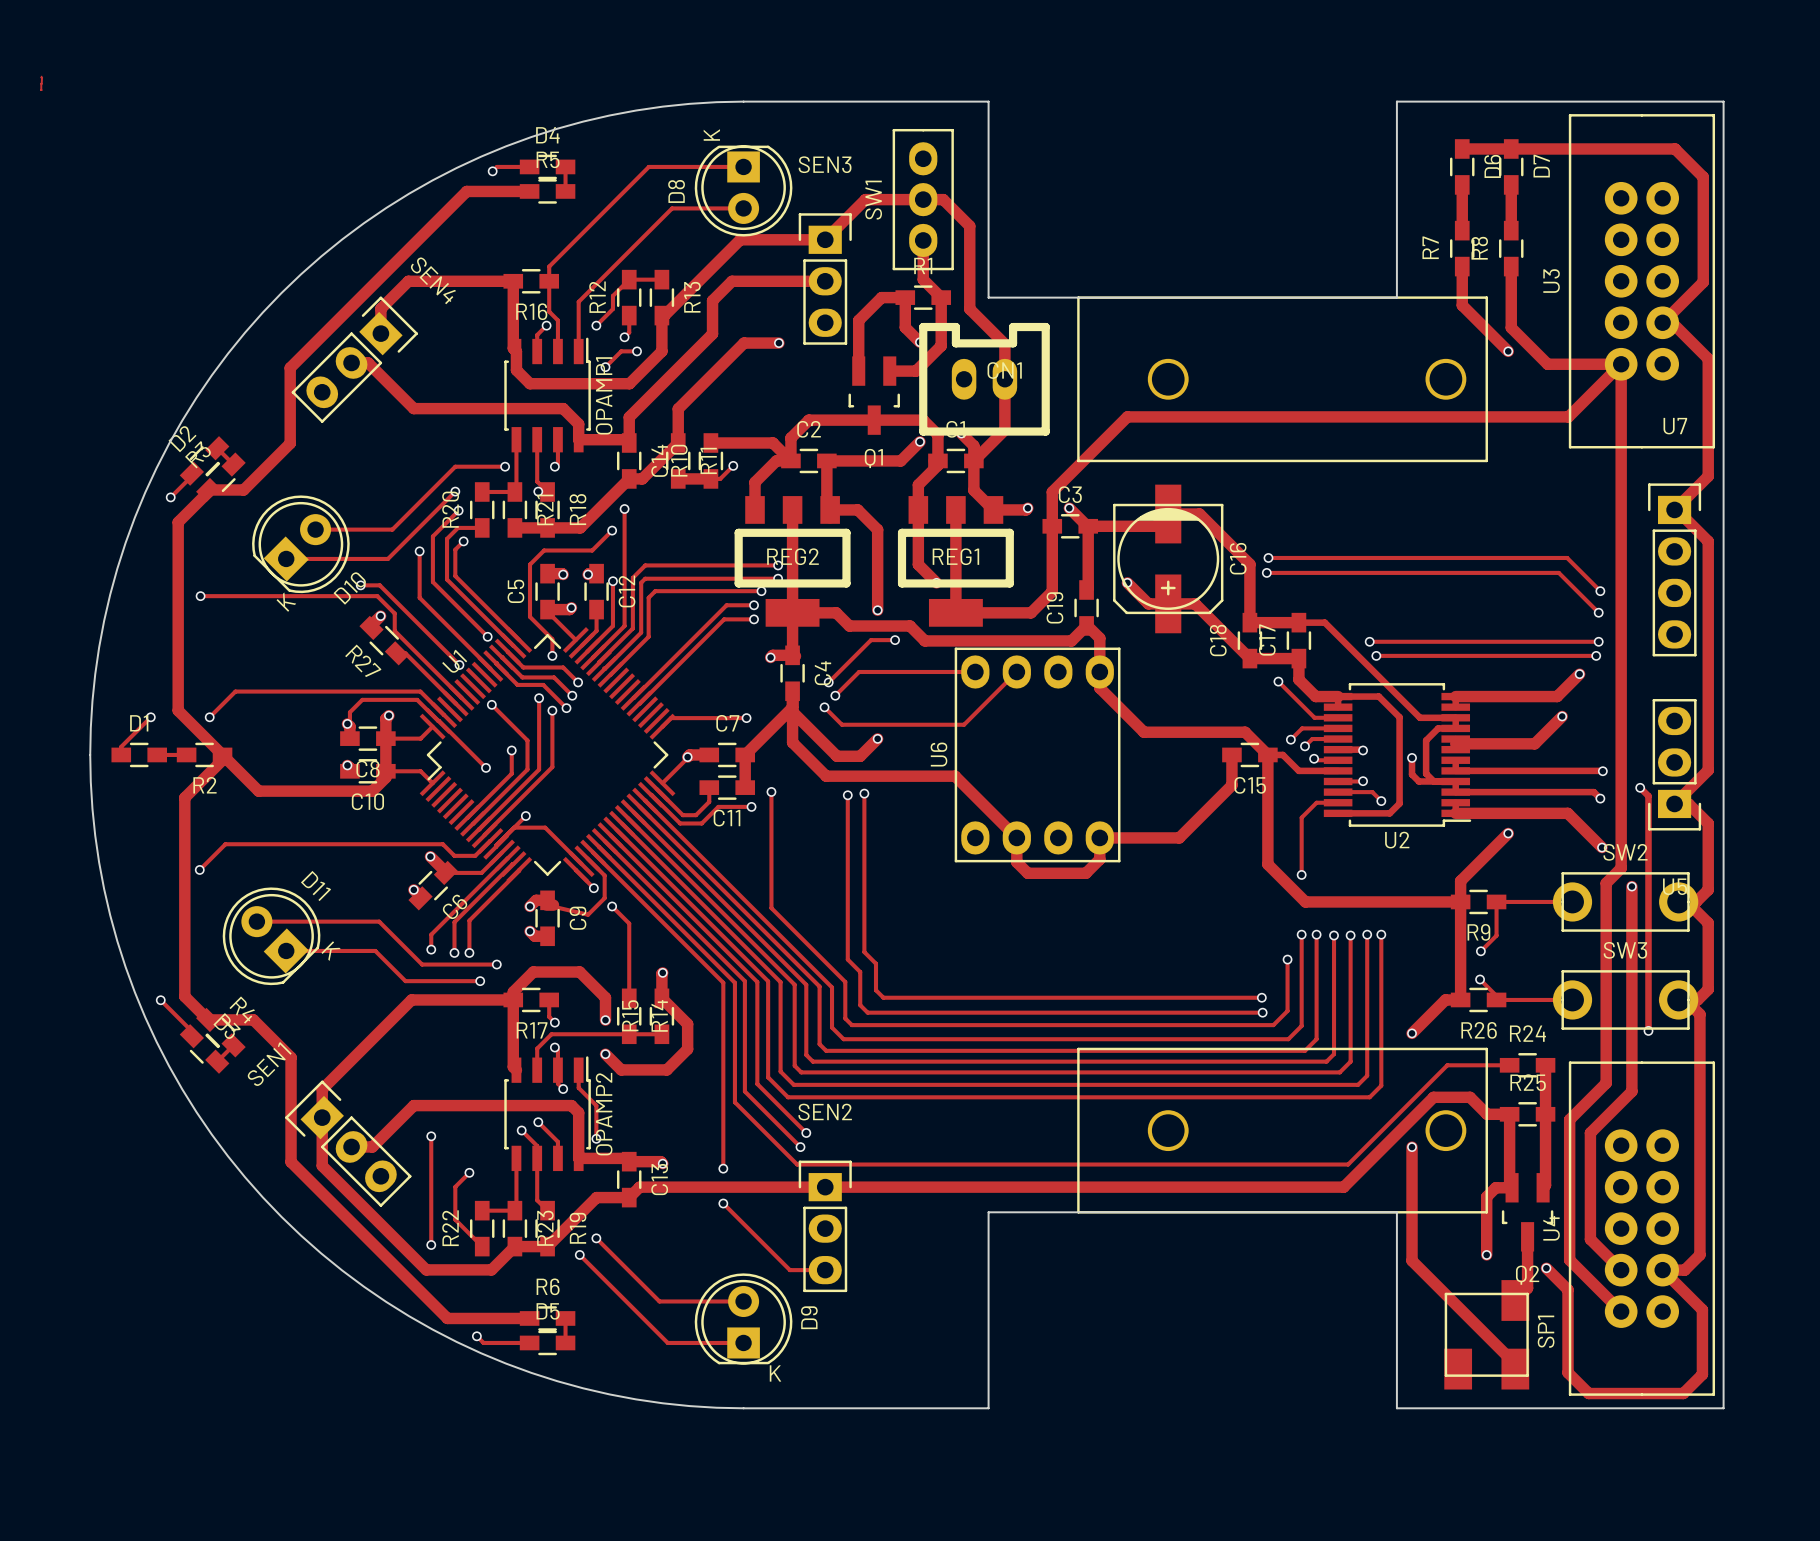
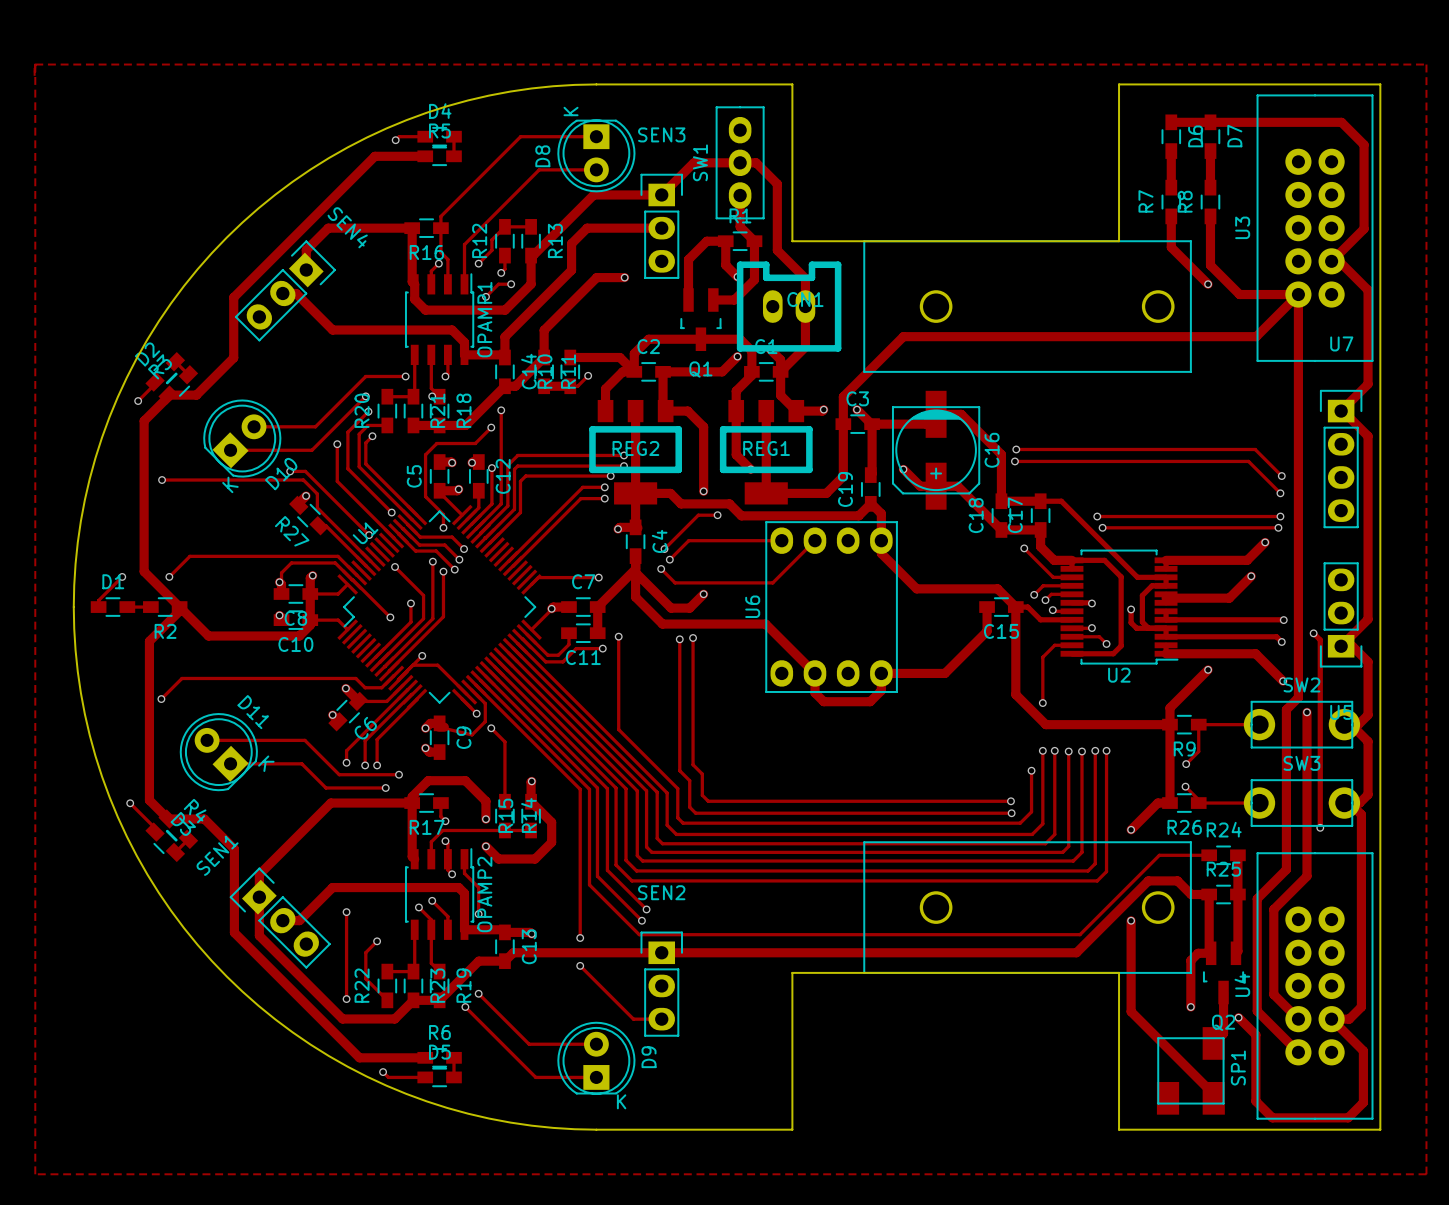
zone outline: none -> (35, 64) (1426, 64) (1426, 1174) (35, 1174) (35, 64)

